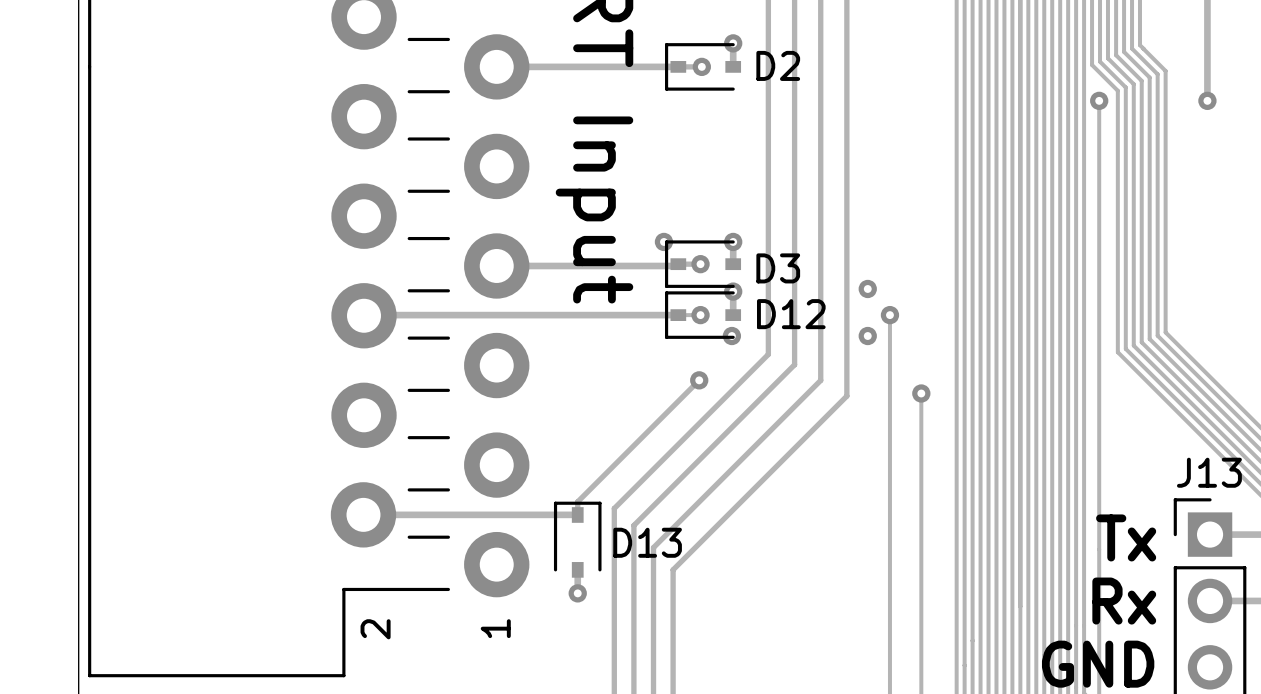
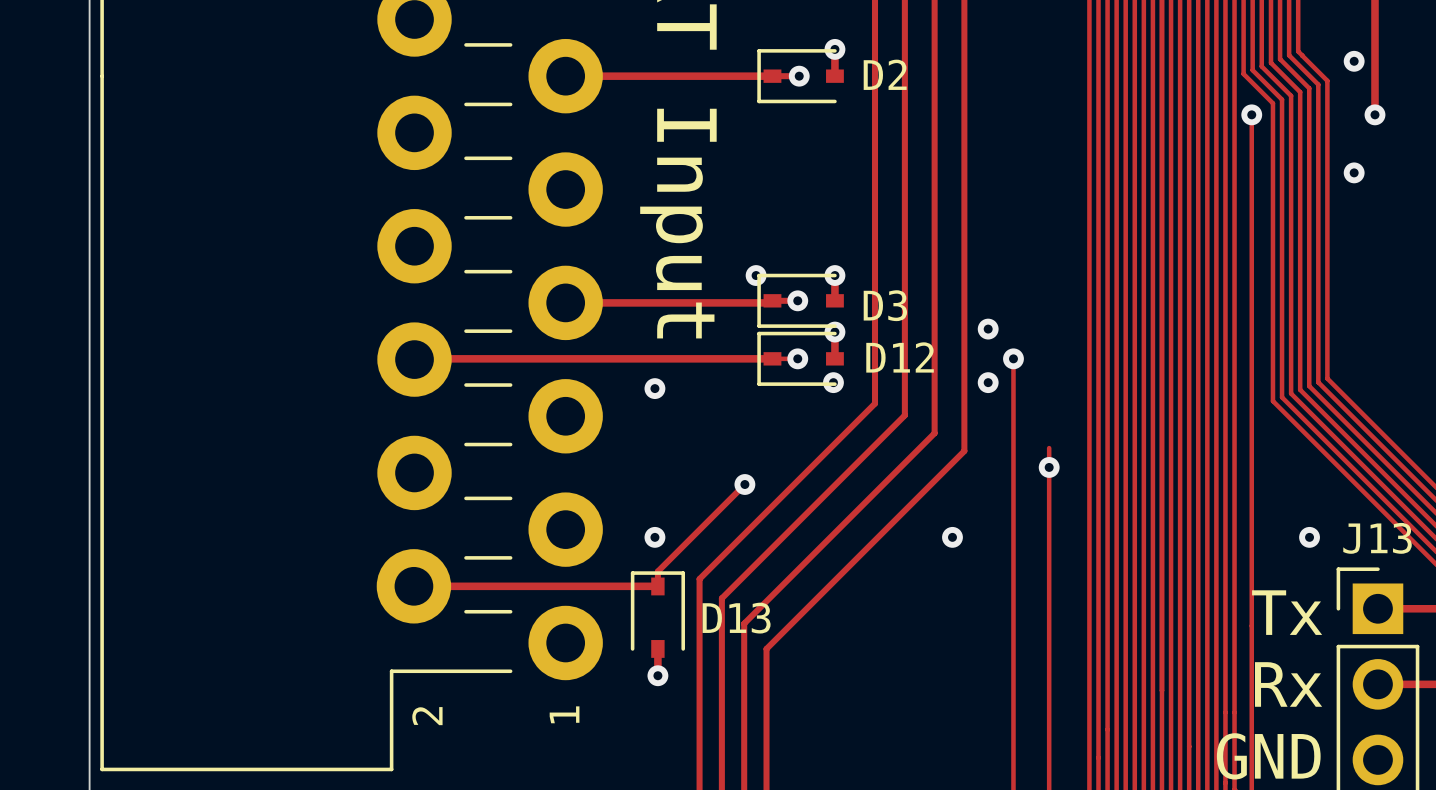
via: none -> (1354, 61)
via: none -> (1354, 172)
via: none -> (654, 388)
track: (699, 380) (654, 425) -> none
via position: (699, 380) -> (744, 484)
via position: (921, 393) -> (1049, 467)
via: none -> (654, 537)
via: none -> (952, 537)
via: none -> (1309, 537)

